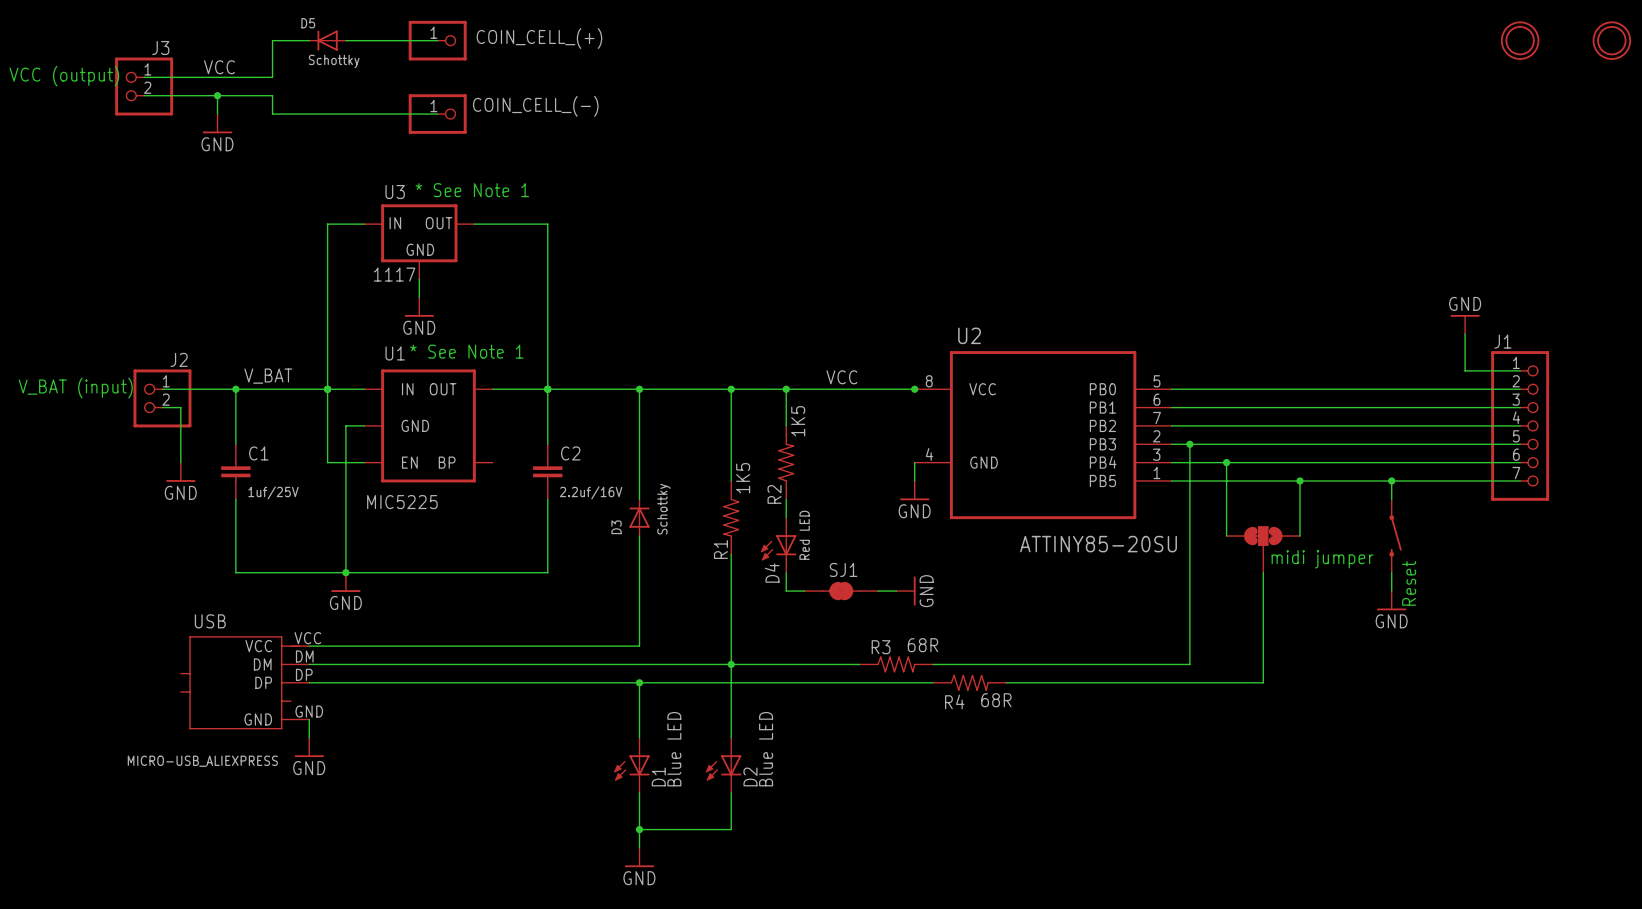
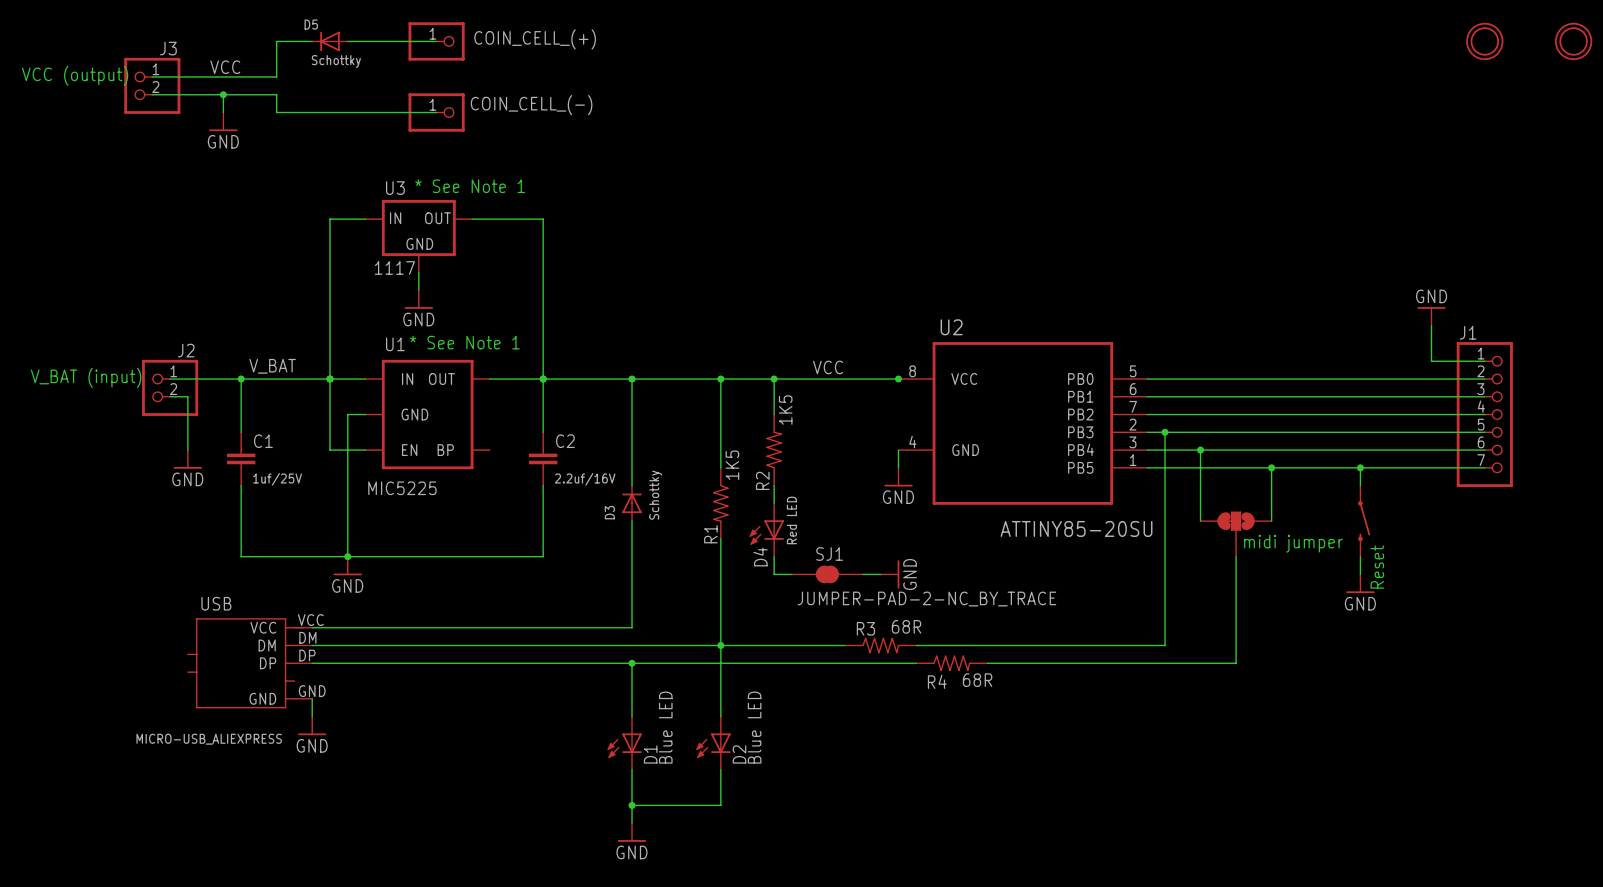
SJ1 value: none -> JUMPER-PAD-2-NC_BY_TRACE (926, 599)

